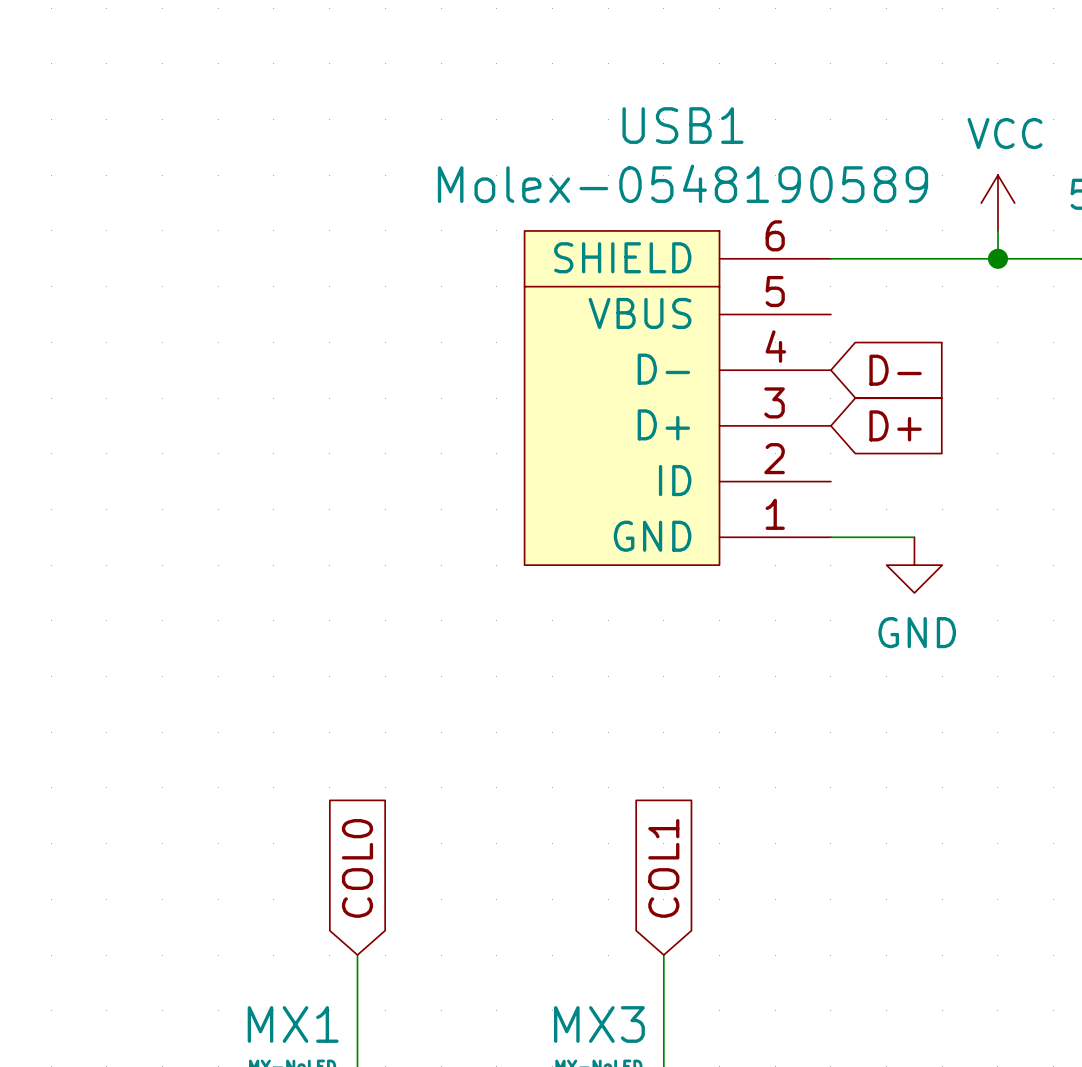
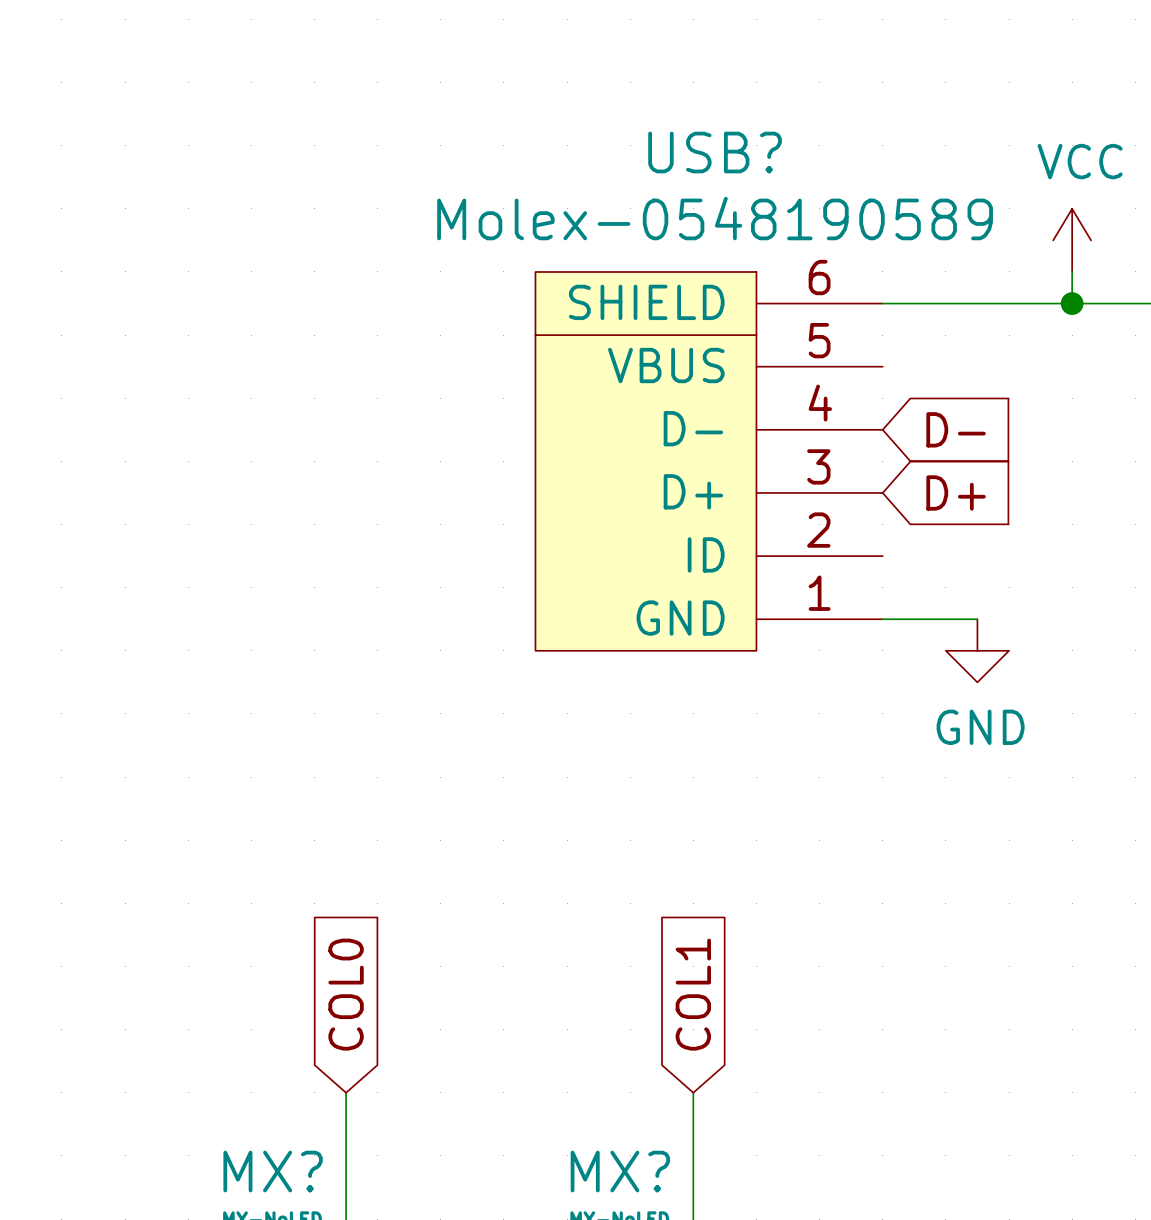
USB1 name: USB1 (682, 125) -> USB? (715, 152)
MX1 name: MX1 (293, 1024) -> MX? (273, 1171)
MX3 name: MX3 (599, 1024) -> MX? (620, 1171)

